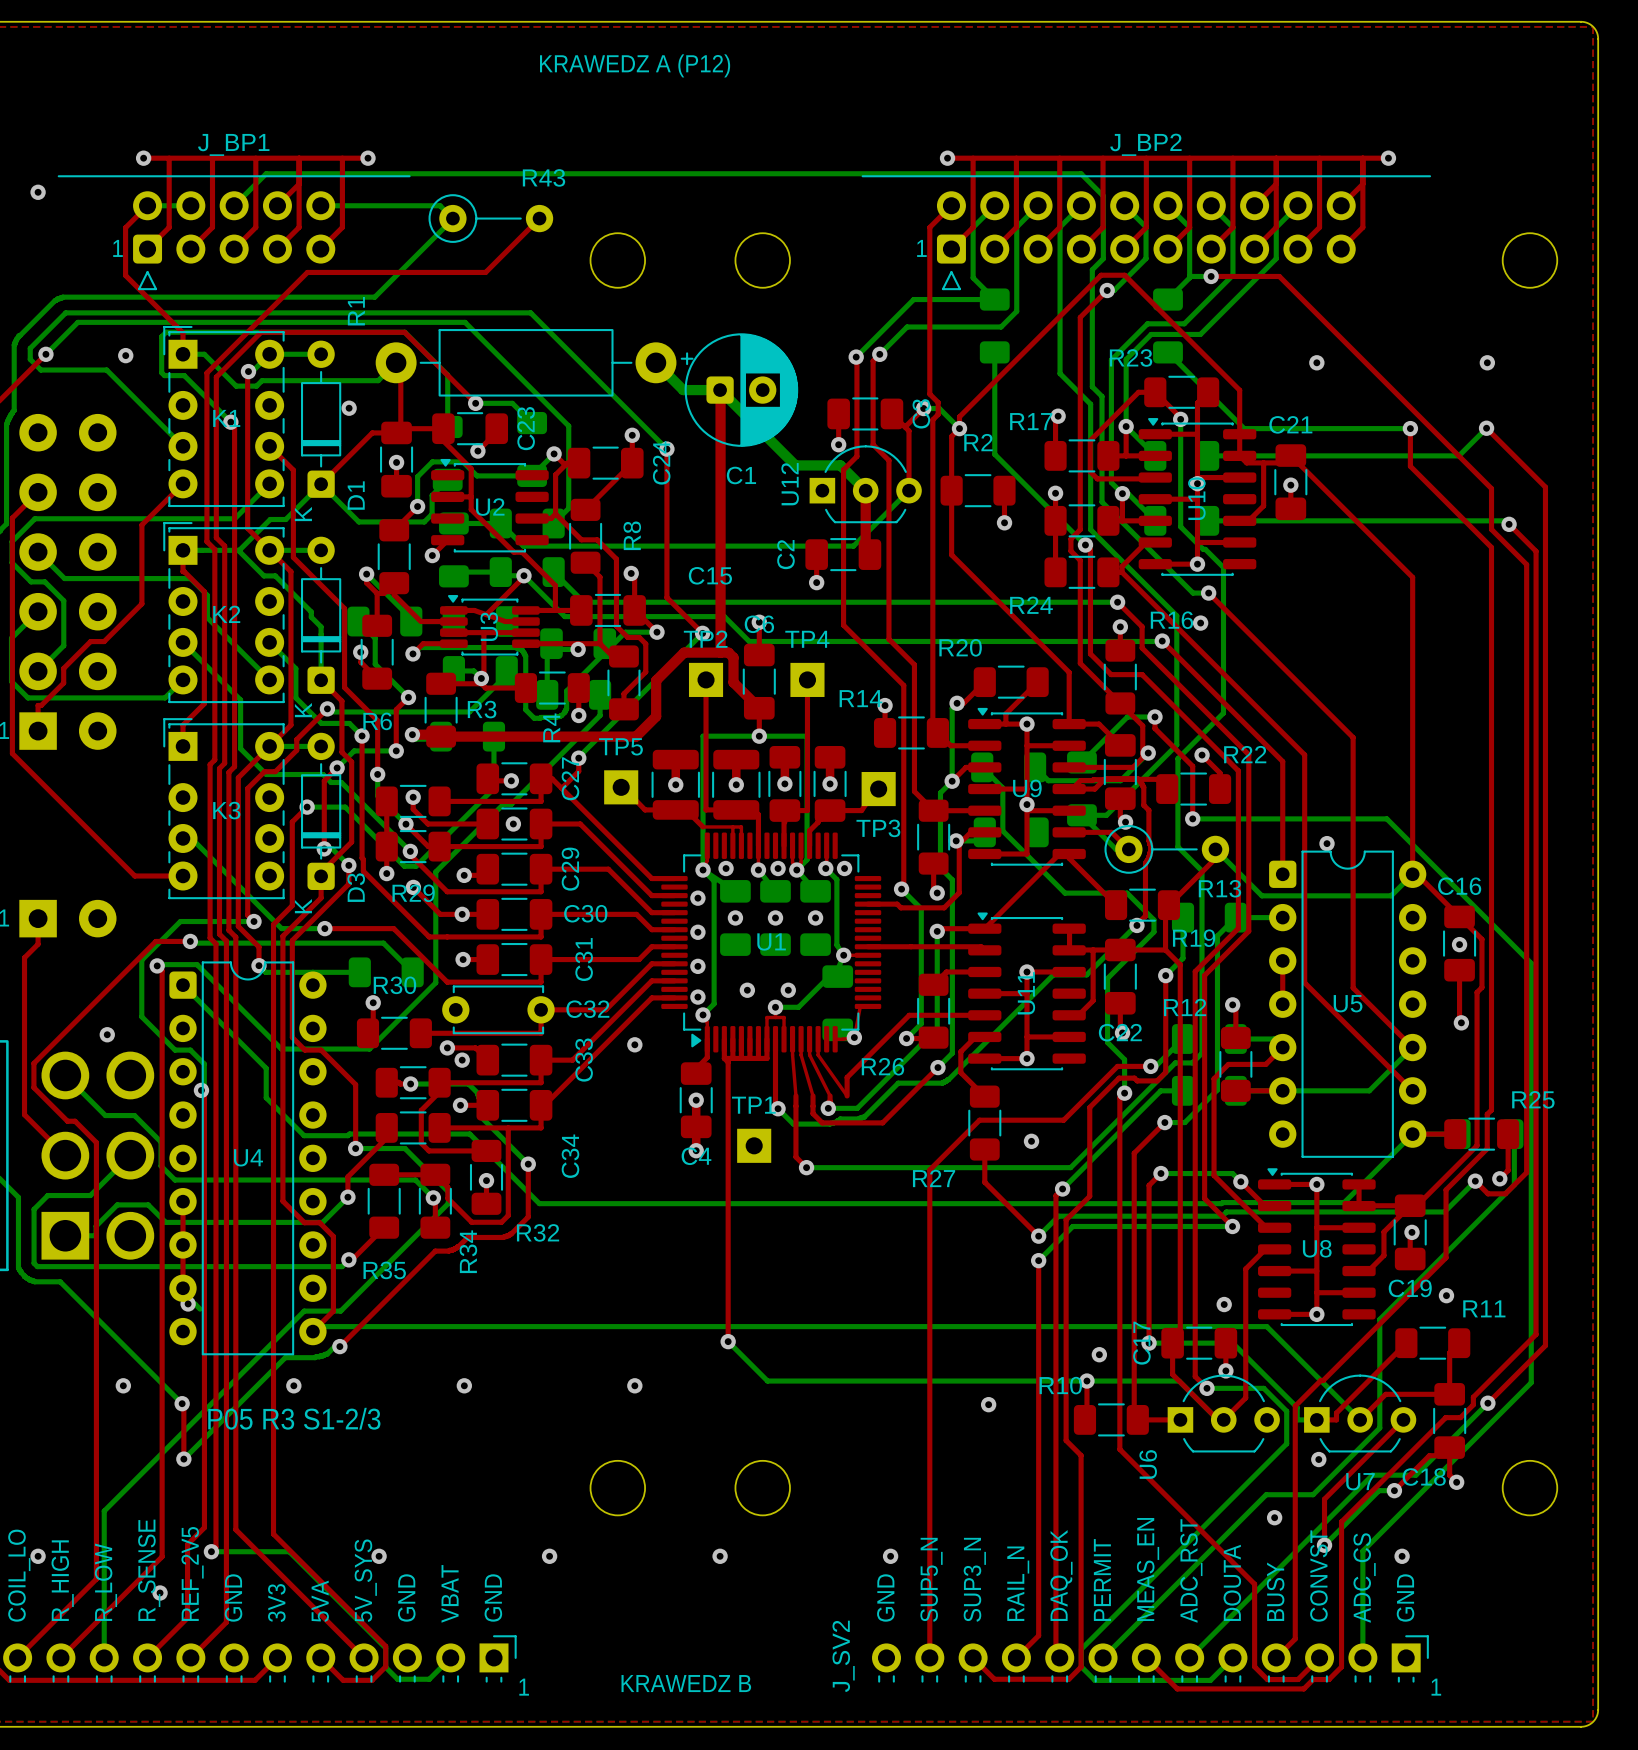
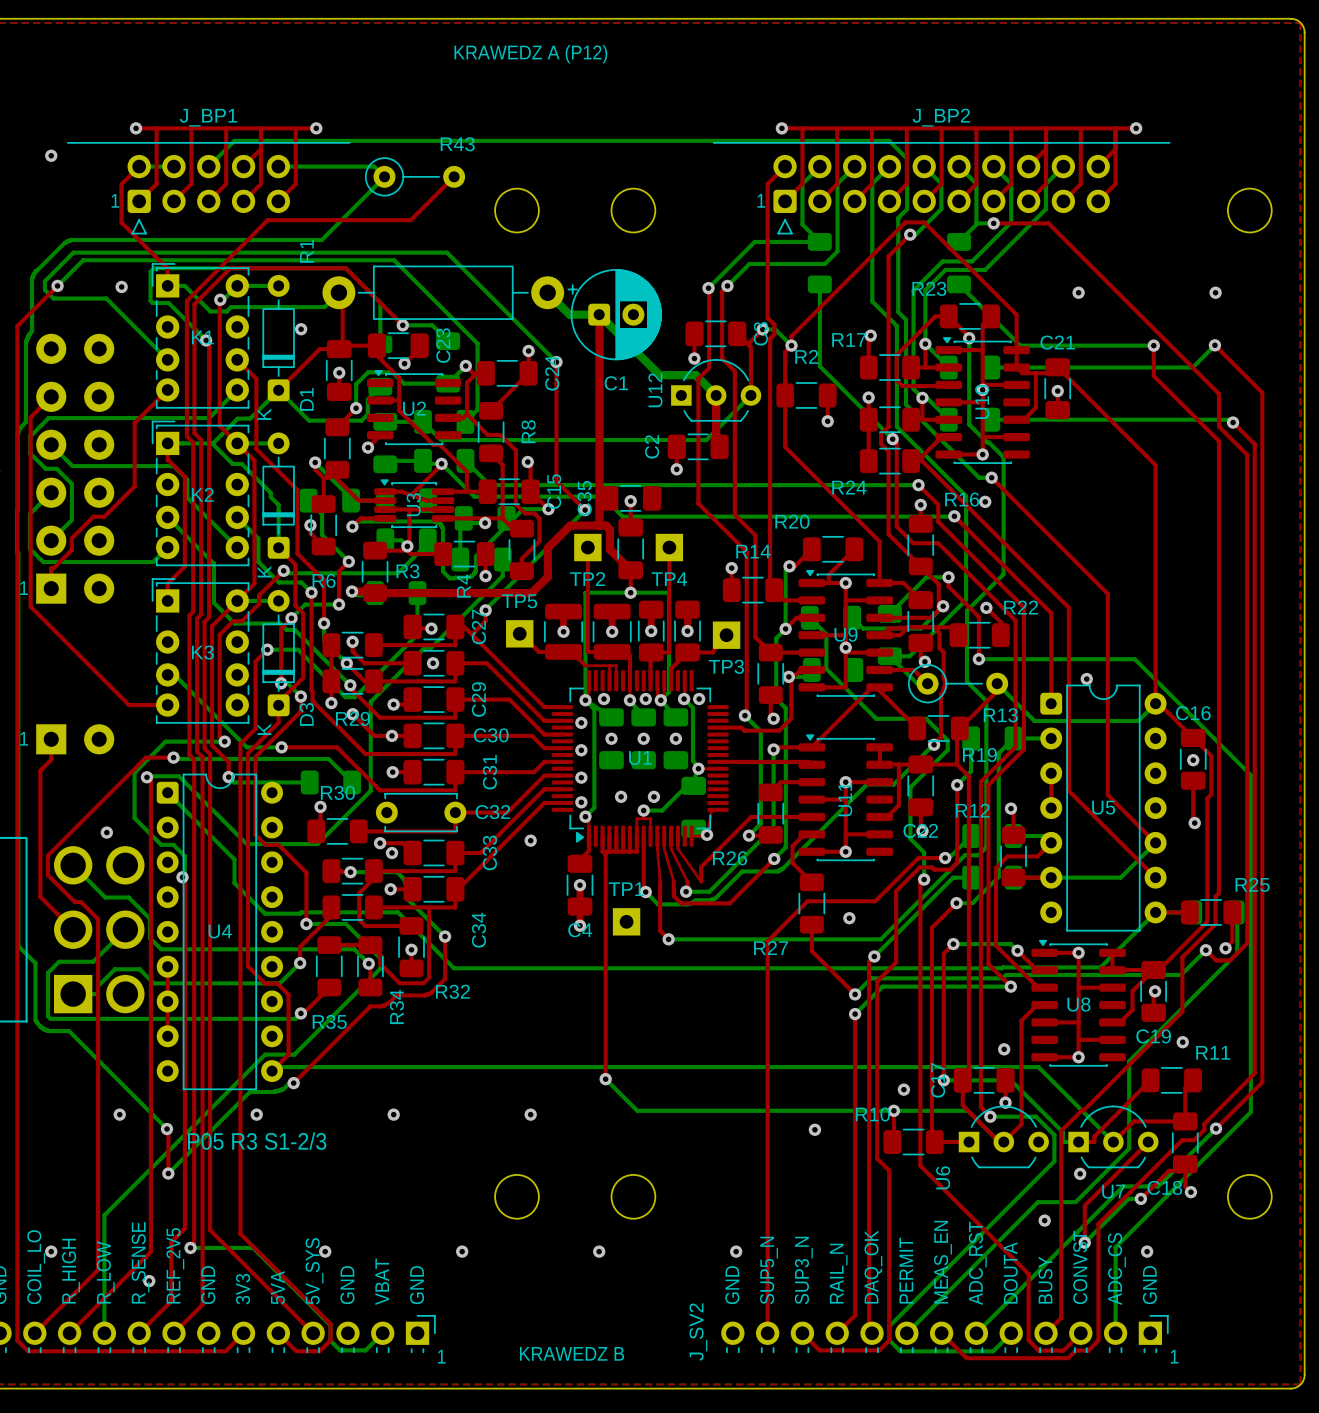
C15 name rotation: 0° (710, 575) -> 90° counterclockwise (554, 491)
C35: none -> (630, 498)
C6 name: C6 (759, 624) -> none
TP2 name position: TP2 (705, 639) -> TP2 (587, 579)
TP4 name position: TP4 (807, 639) -> TP4 (669, 579)
R14 name position: R14 (860, 698) -> R14 (753, 551)
bottom track: (188, 1303) (194, 1303) (200, 1309) -> none
via: (188, 1303) -> none

